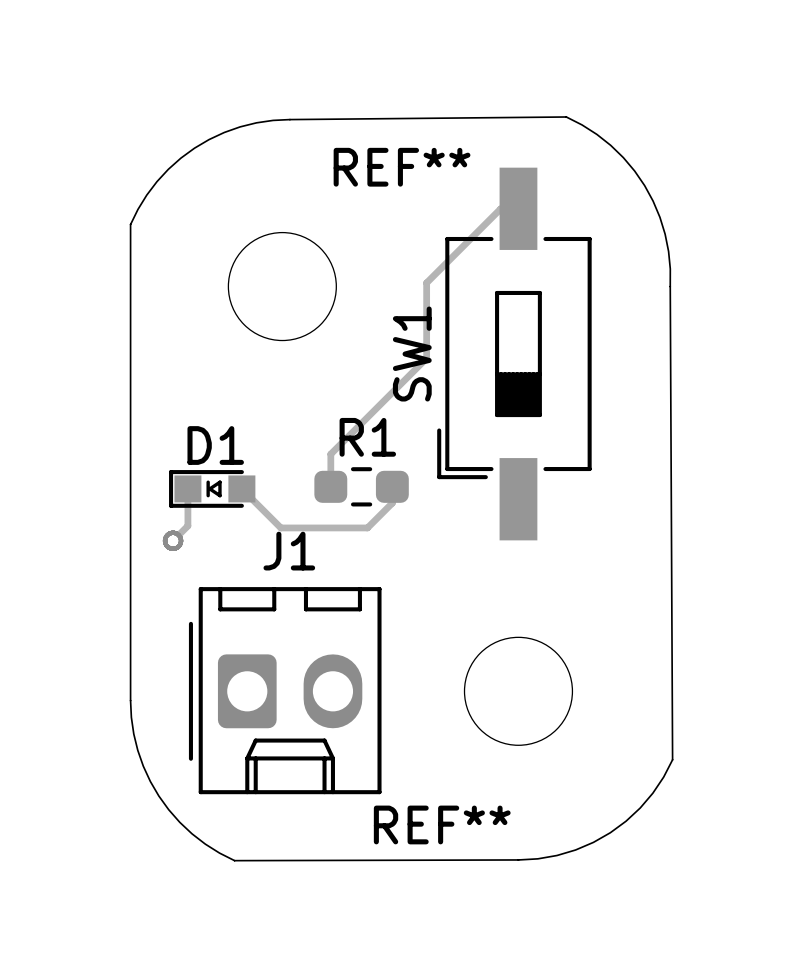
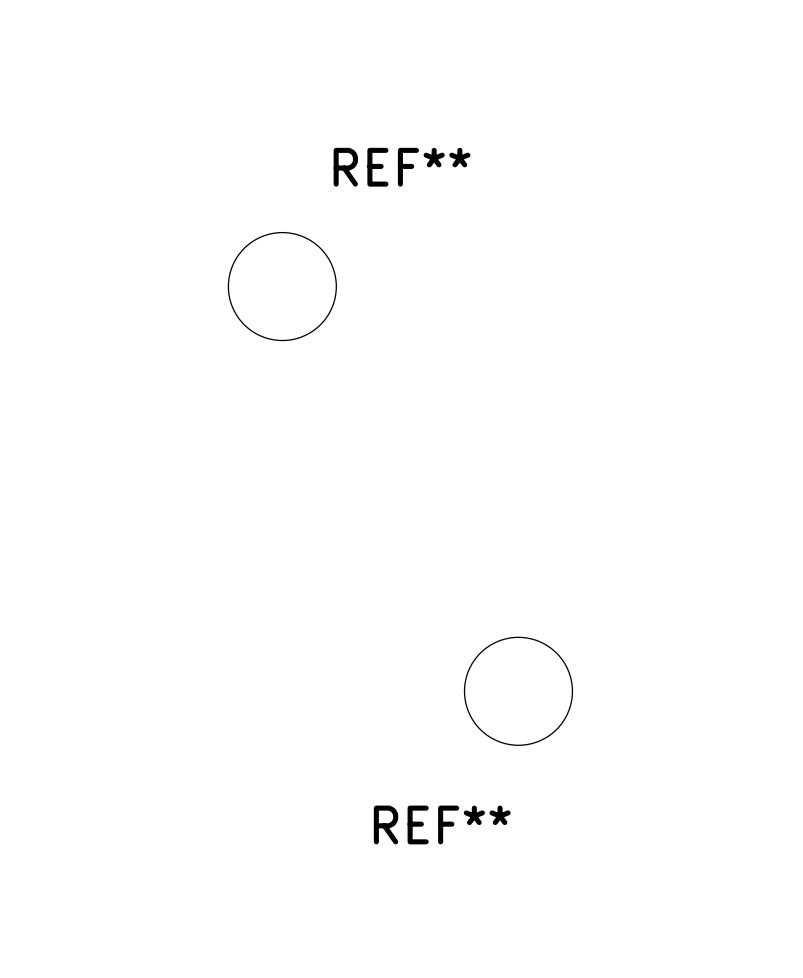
board edge: (566, 116) (289, 119) (256, 122) (224, 132) (194, 148) (180, 158) (156, 181) (137, 209) (130, 224) (130, 700) (133, 734) (143, 766) (158, 796) (168, 809) (192, 833) (219, 853) (234, 860) (518, 859) (557, 855) (593, 842) (626, 821) (652, 793) (672, 759) (670, 268) (668, 251) (665, 234) (653, 201) (634, 171) (610, 145) (582, 124) (566, 116) -> none
track: (518, 208) (500, 208) (426, 282) (426, 358) (330, 454) (330, 486) -> none
SW1: (514, 354) -> none
R1: (361, 486) -> none
track: (392, 486) (392, 503) (367, 527) (280, 527) (241, 488) -> none
track: (187, 488) (187, 525) (173, 540) -> none
D1: (212, 488) -> none
via: (173, 540) -> none
J1: (285, 690) -> none

